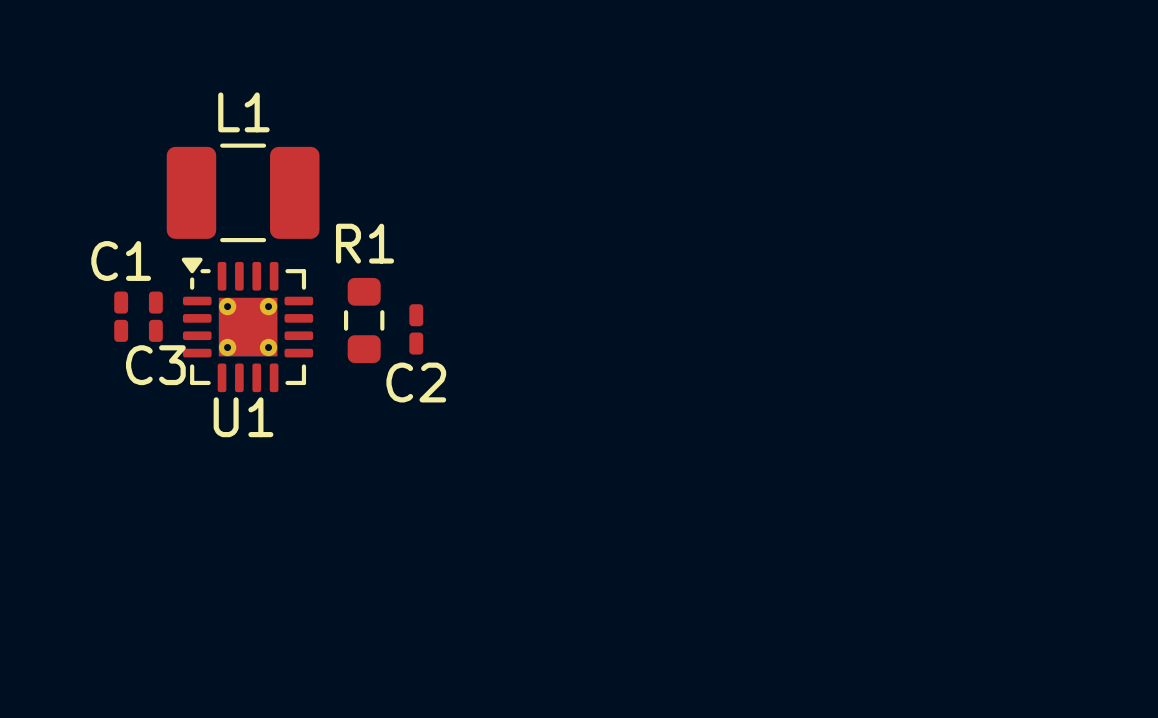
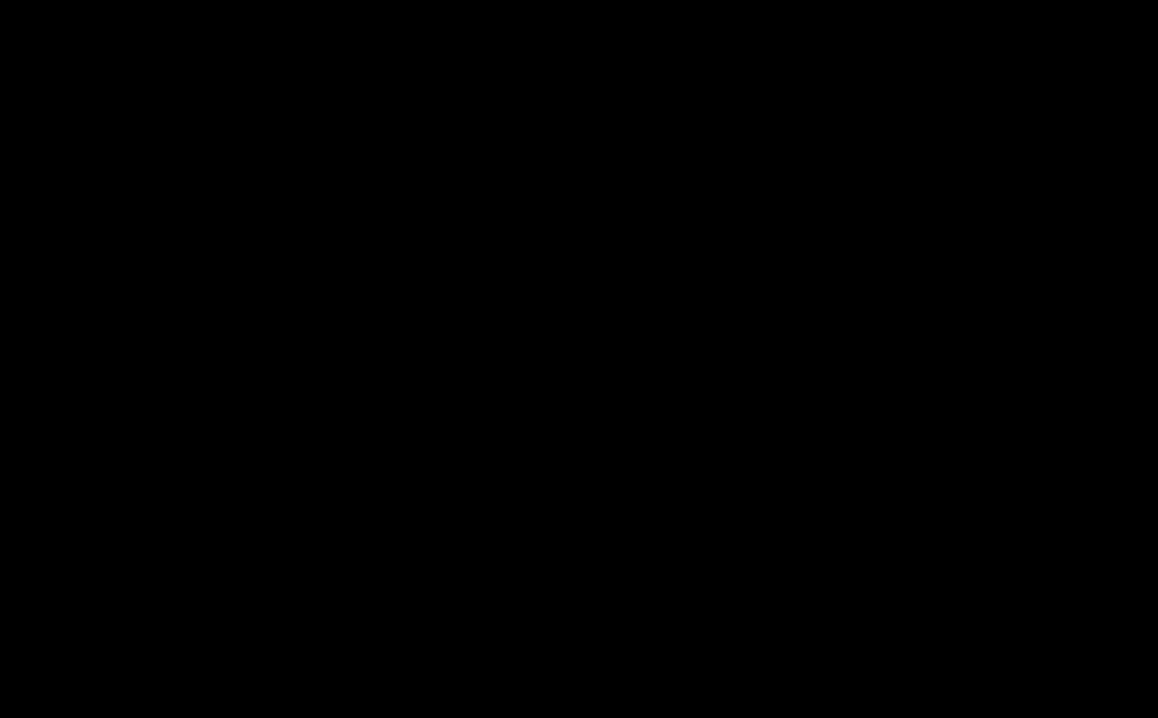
L1: (243, 192) -> none
C1: (121, 316) -> none
C3: (155, 316) -> none
R1: (364, 320) -> none
U1: (247, 324) -> none
C2: (416, 329) -> none

